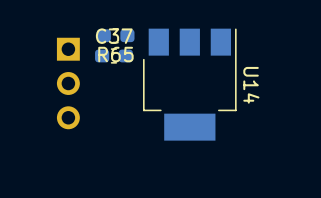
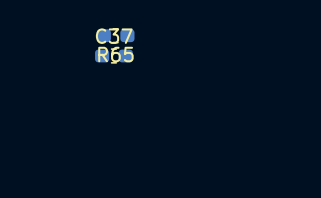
part: (68, 83) -> none
U14: (189, 84) -> none

